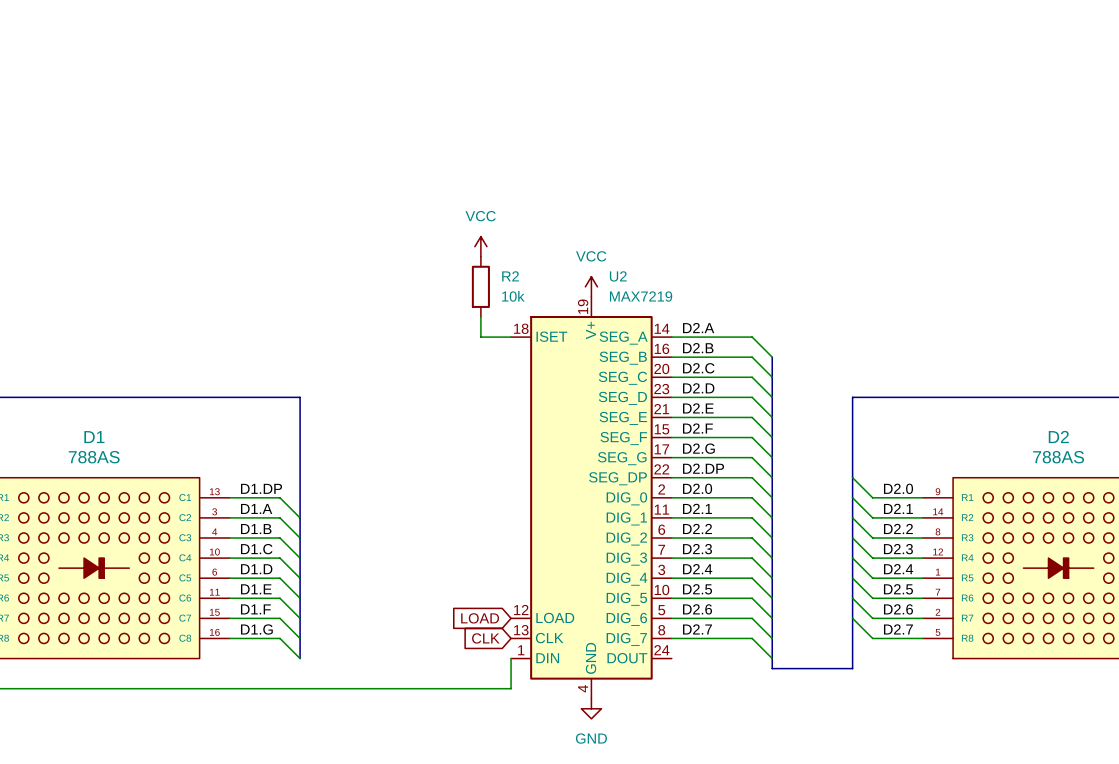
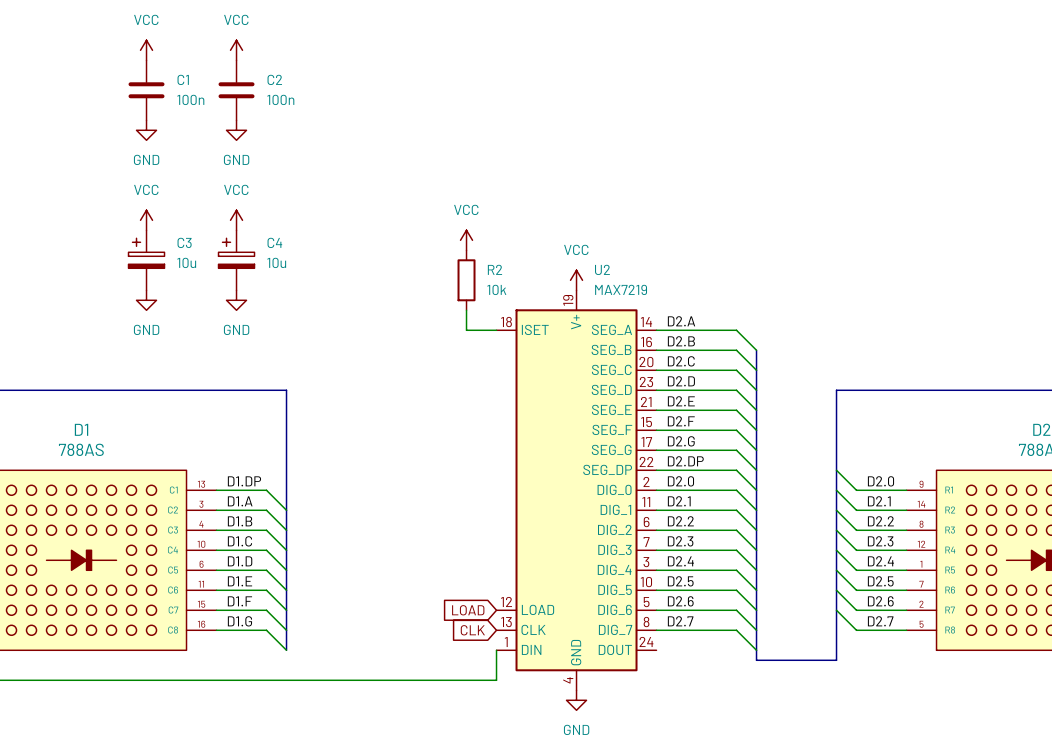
power symbol: none -> VCC (146, 50)
power symbol: none -> VCC (236, 50)
C1: none -> 100n (146, 90)
C2: none -> 100n (236, 90)
power symbol: none -> GND (146, 130)
power symbol: none -> GND (236, 130)
power symbol: none -> VCC (146, 220)
power symbol: none -> VCC (236, 220)
C3: none -> 10u (146, 260)
C4: none -> 10u (236, 260)
power symbol: none -> GND (146, 300)
power symbol: none -> GND (236, 300)

